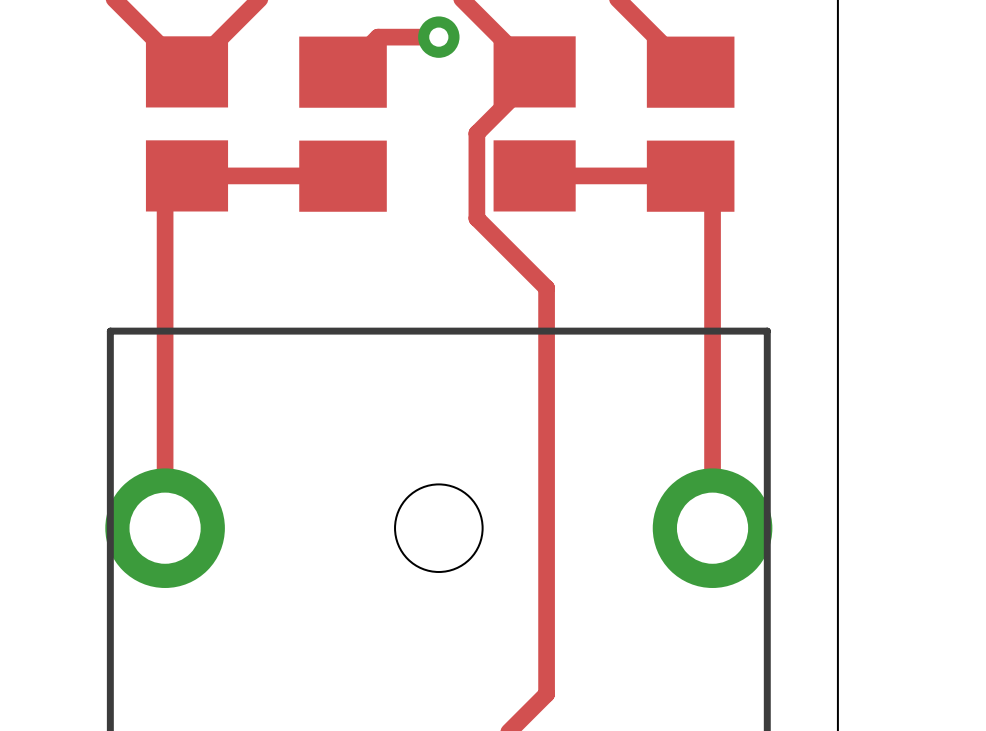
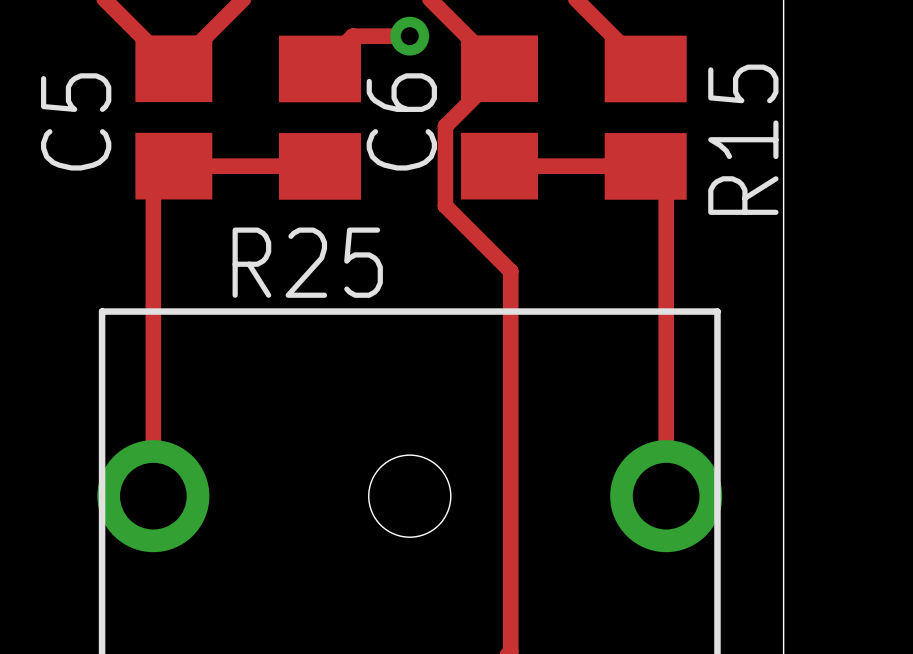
R15 name: none -> R15 (743, 139)
C5 name: none -> C5 (76, 121)
C6 name: none -> C6 (401, 121)
R25 name: none -> R25 (307, 262)

